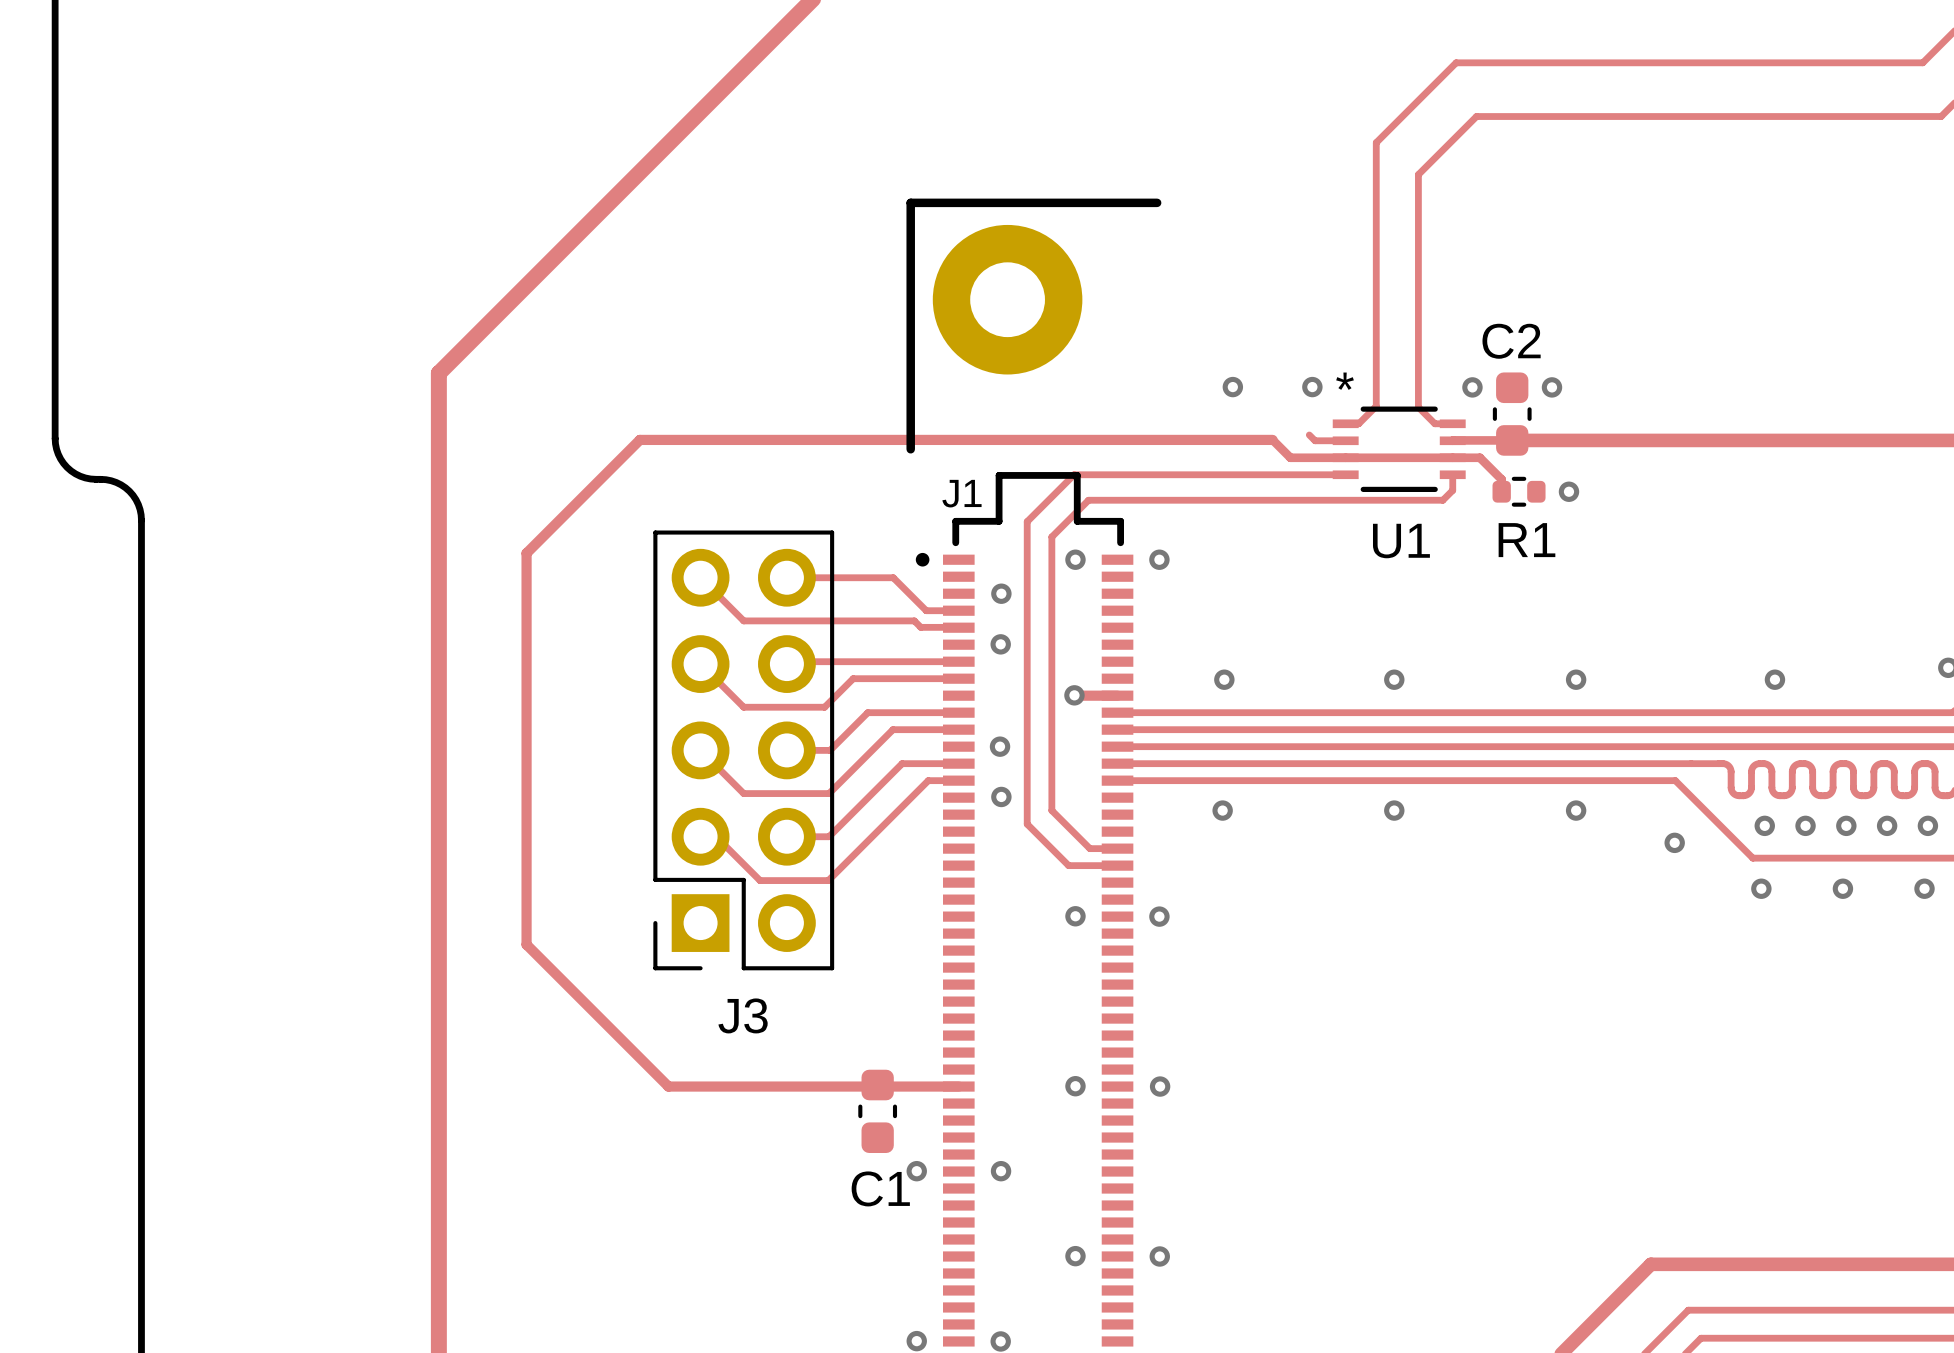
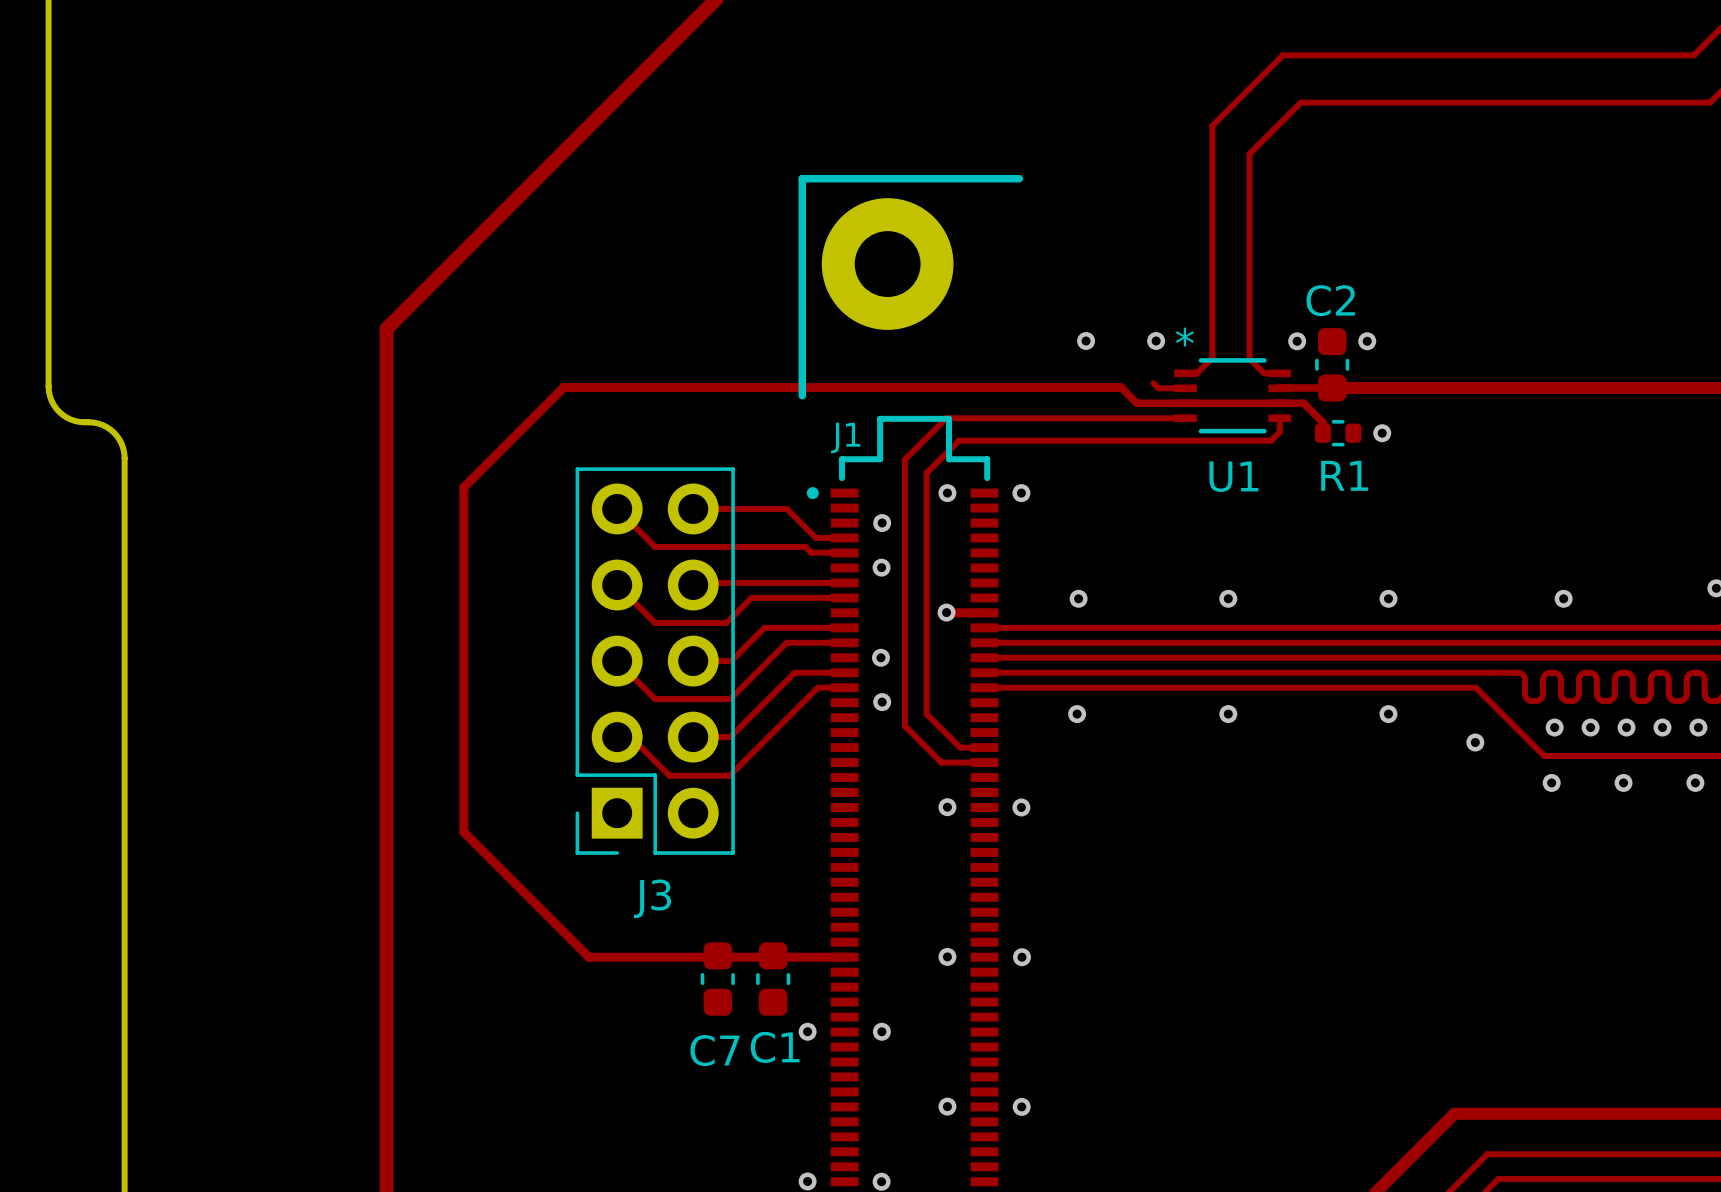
C7: none -> (717, 979)

